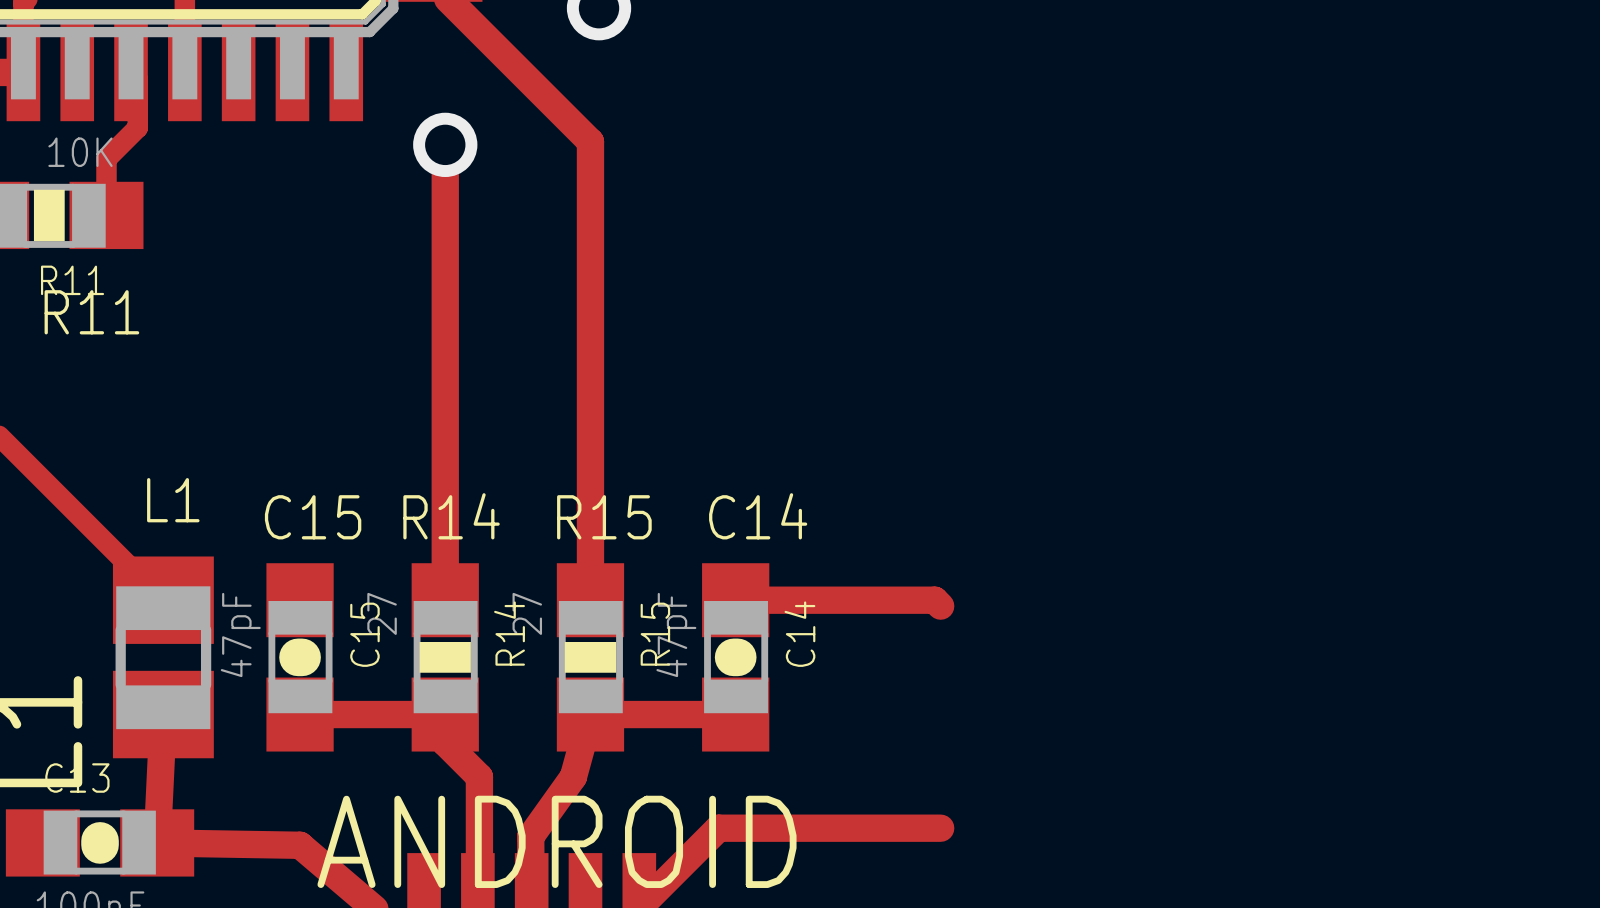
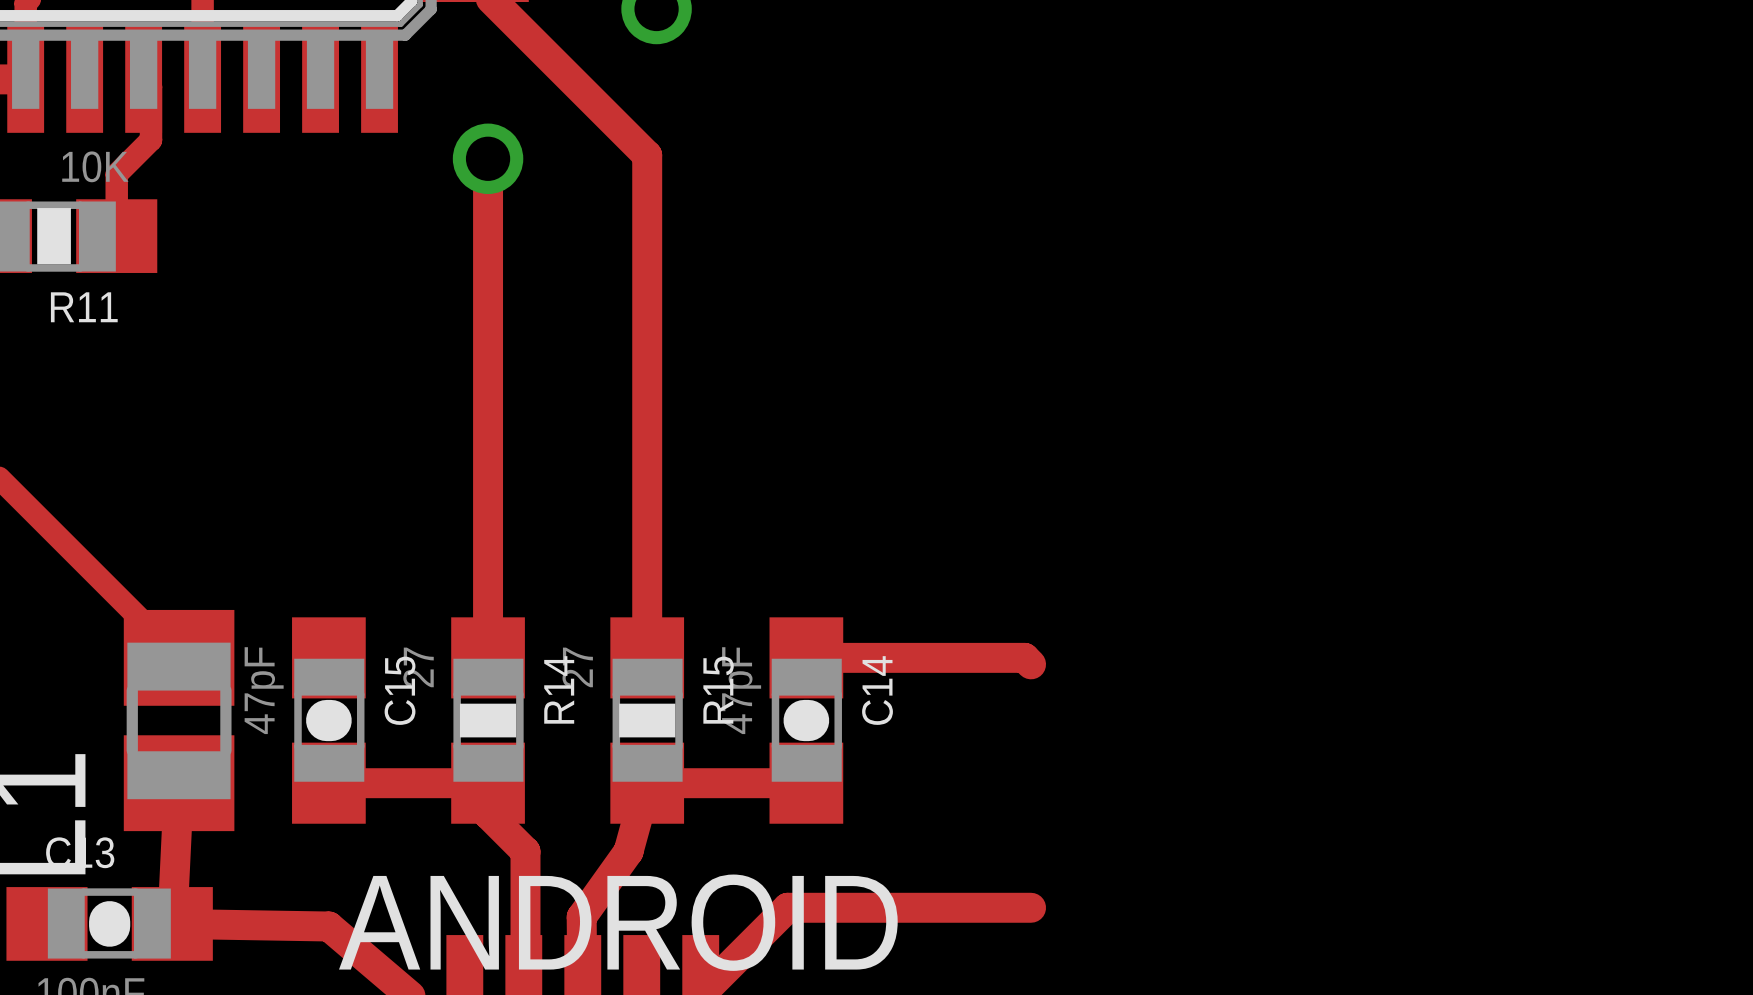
text: R11 (91, 312) -> none
text: L1 (173, 500) -> none
text: R14 (451, 516) -> none
text: C14 (758, 516) -> none
text: C15 (313, 517) -> none
text: R15 (604, 517) -> none

